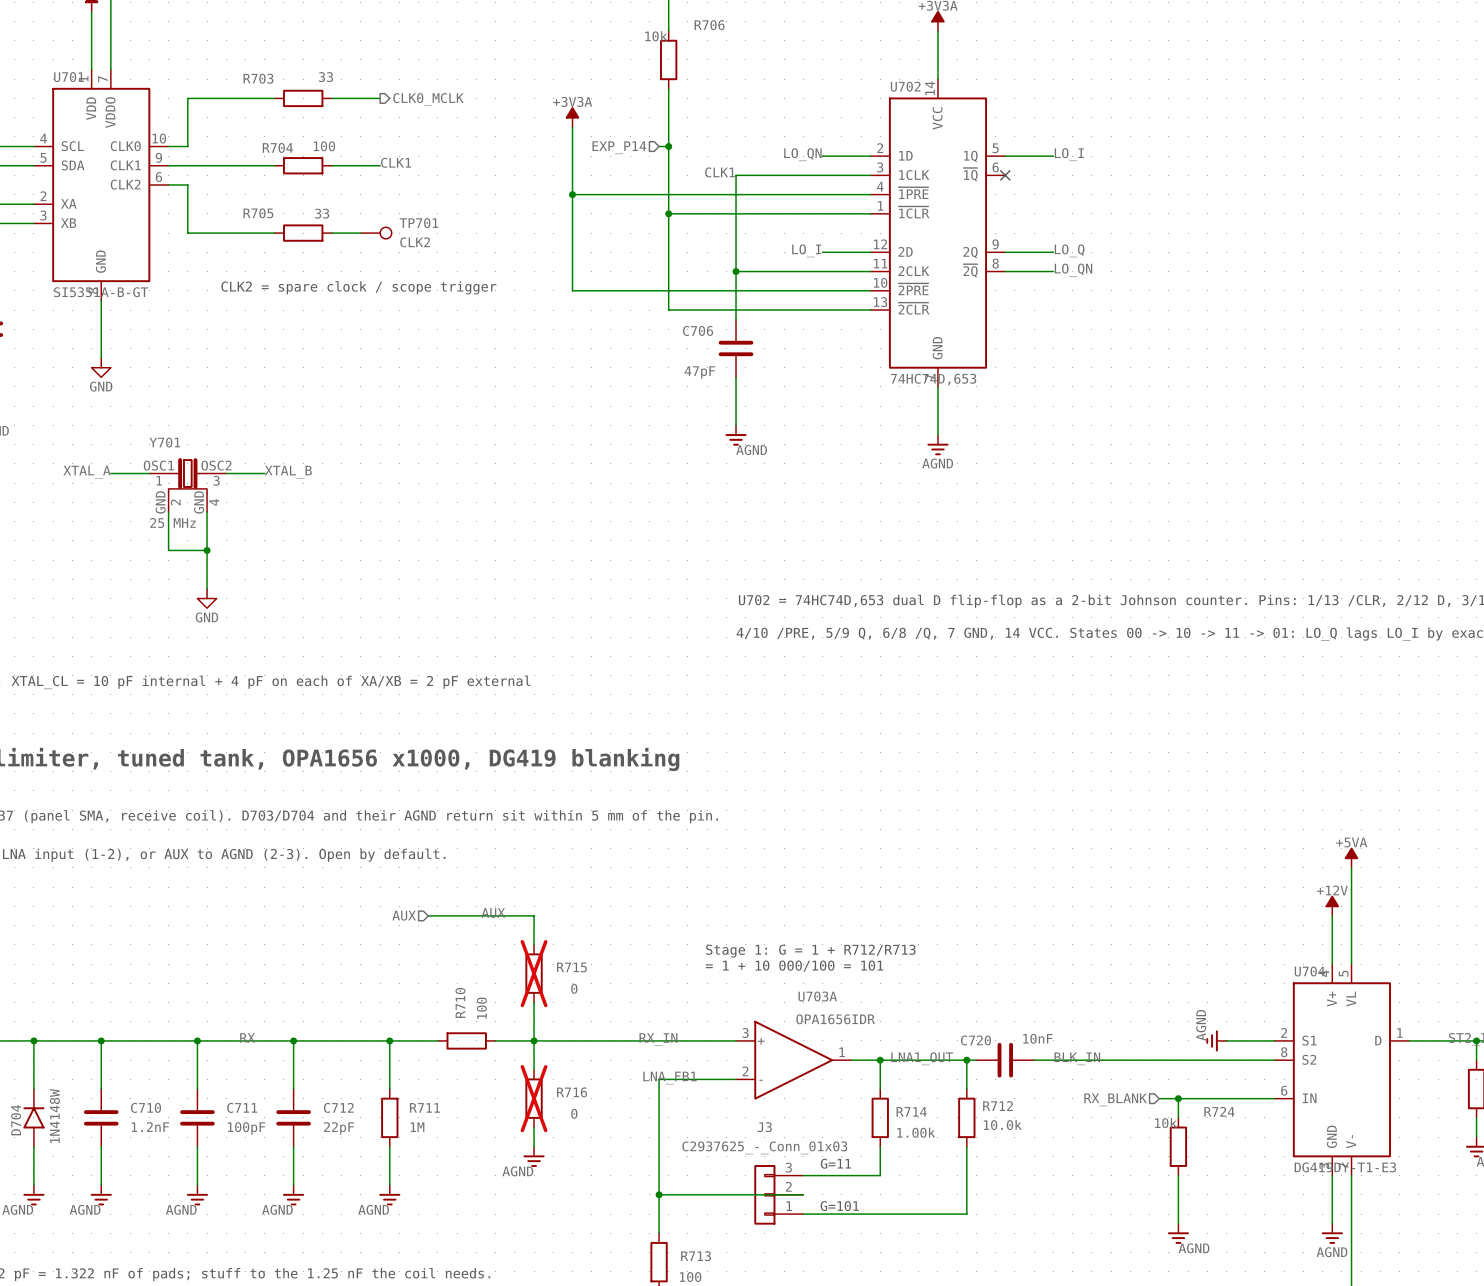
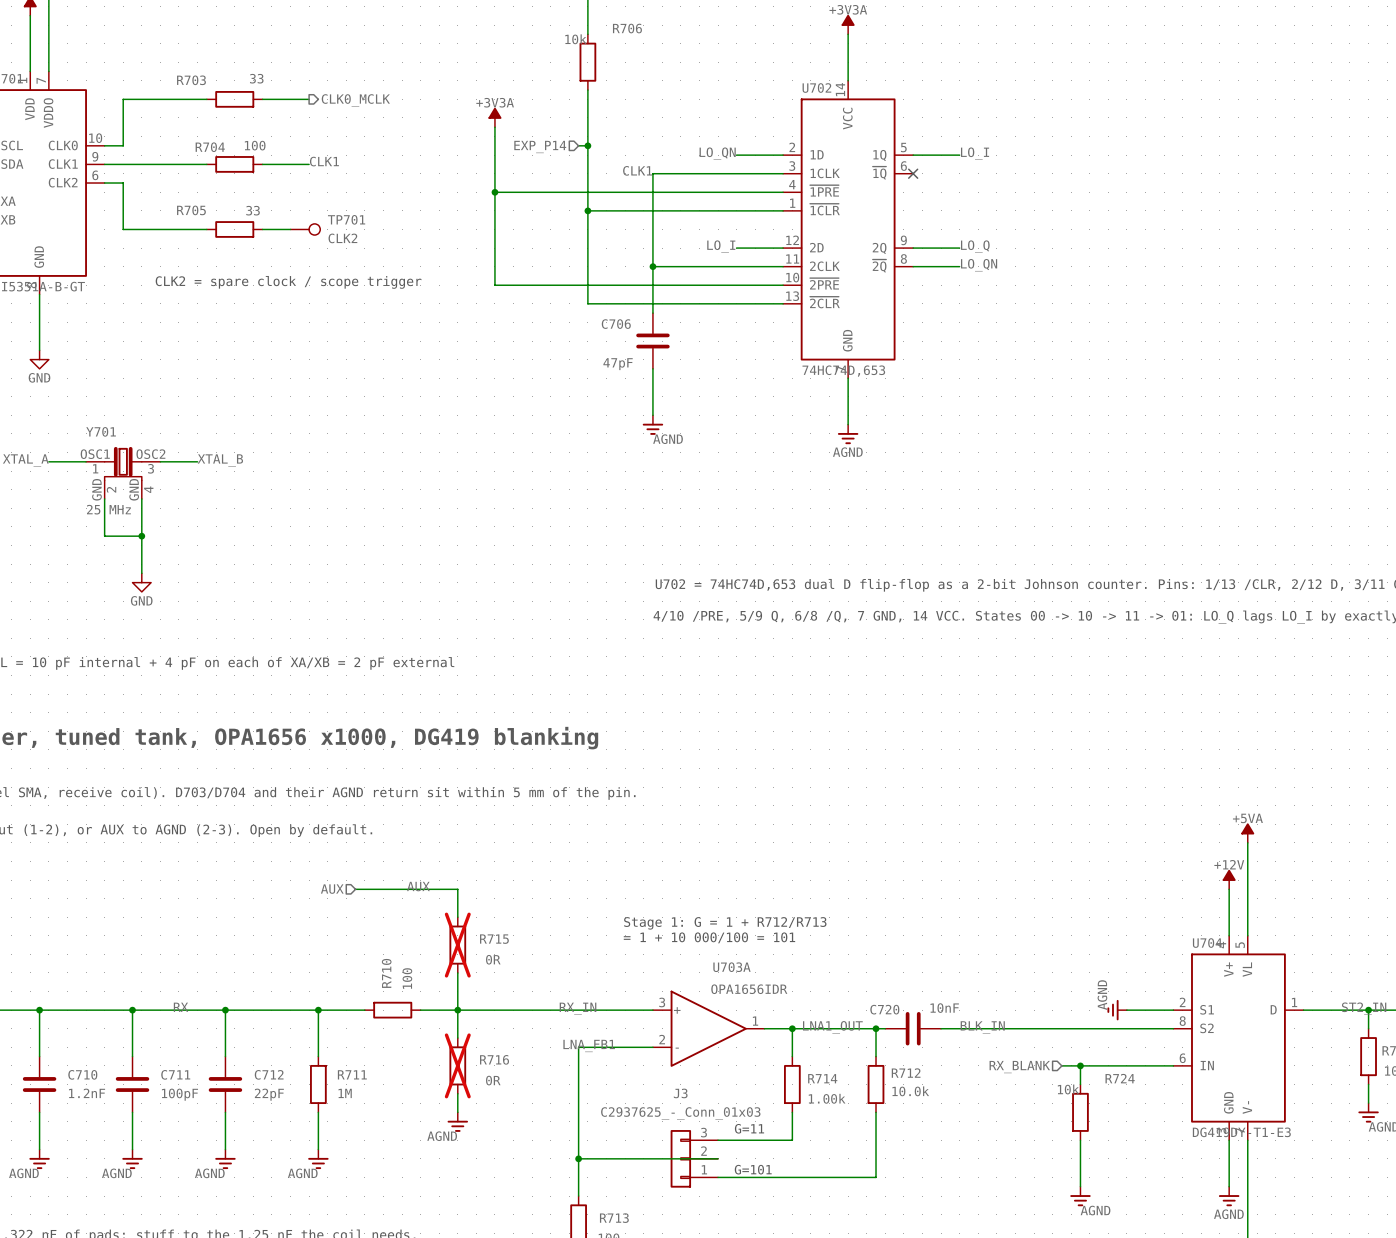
R715 value: 0 (574, 988) -> 0R (493, 959)
R716 value: 0 (574, 1113) -> 0R (493, 1080)

